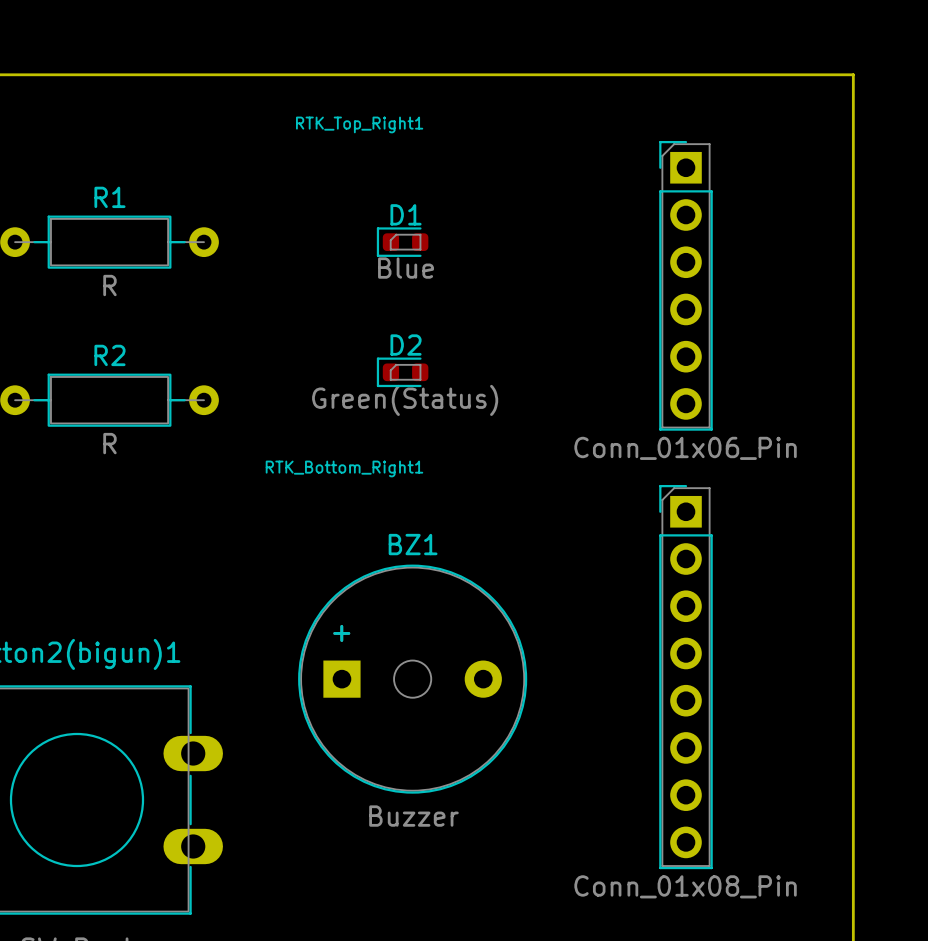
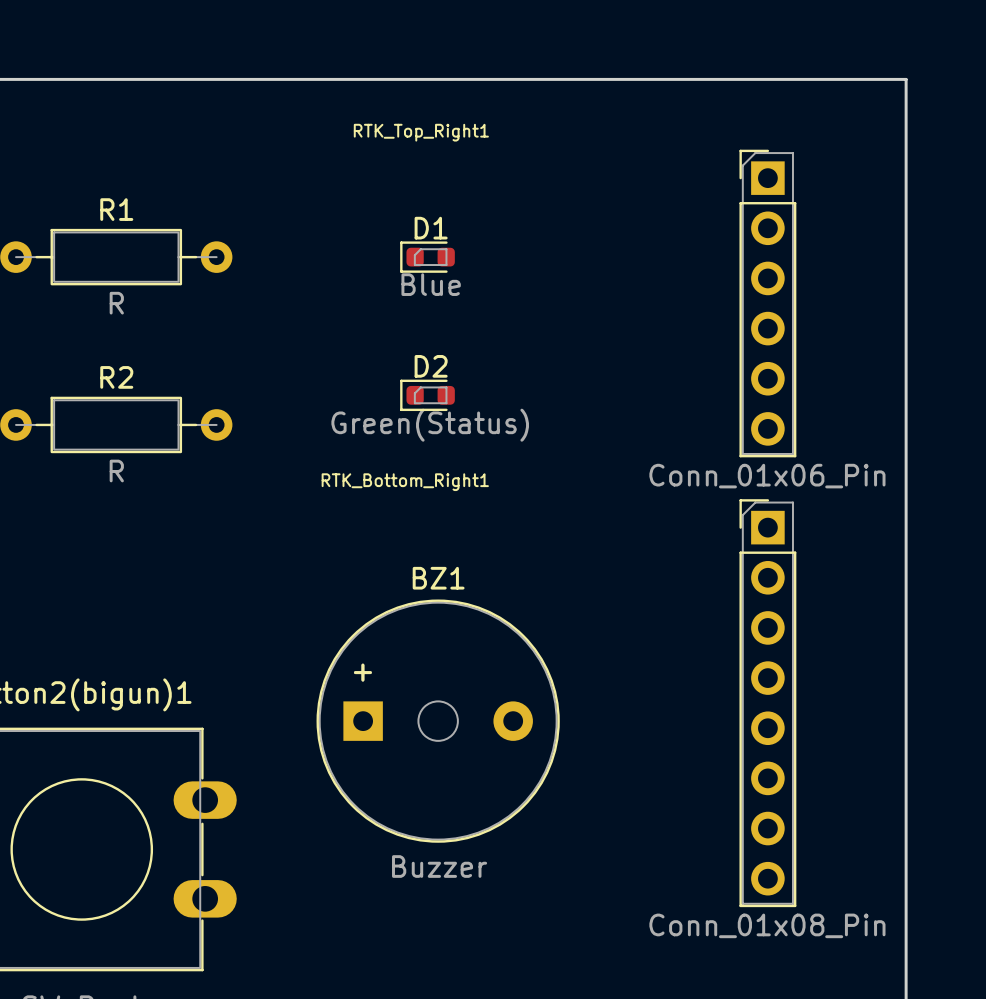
RTK_Top_Right1 position: (685, 285) -> (767, 303)
RTK_Bottom_Right1 position: (685, 677) -> (767, 703)

